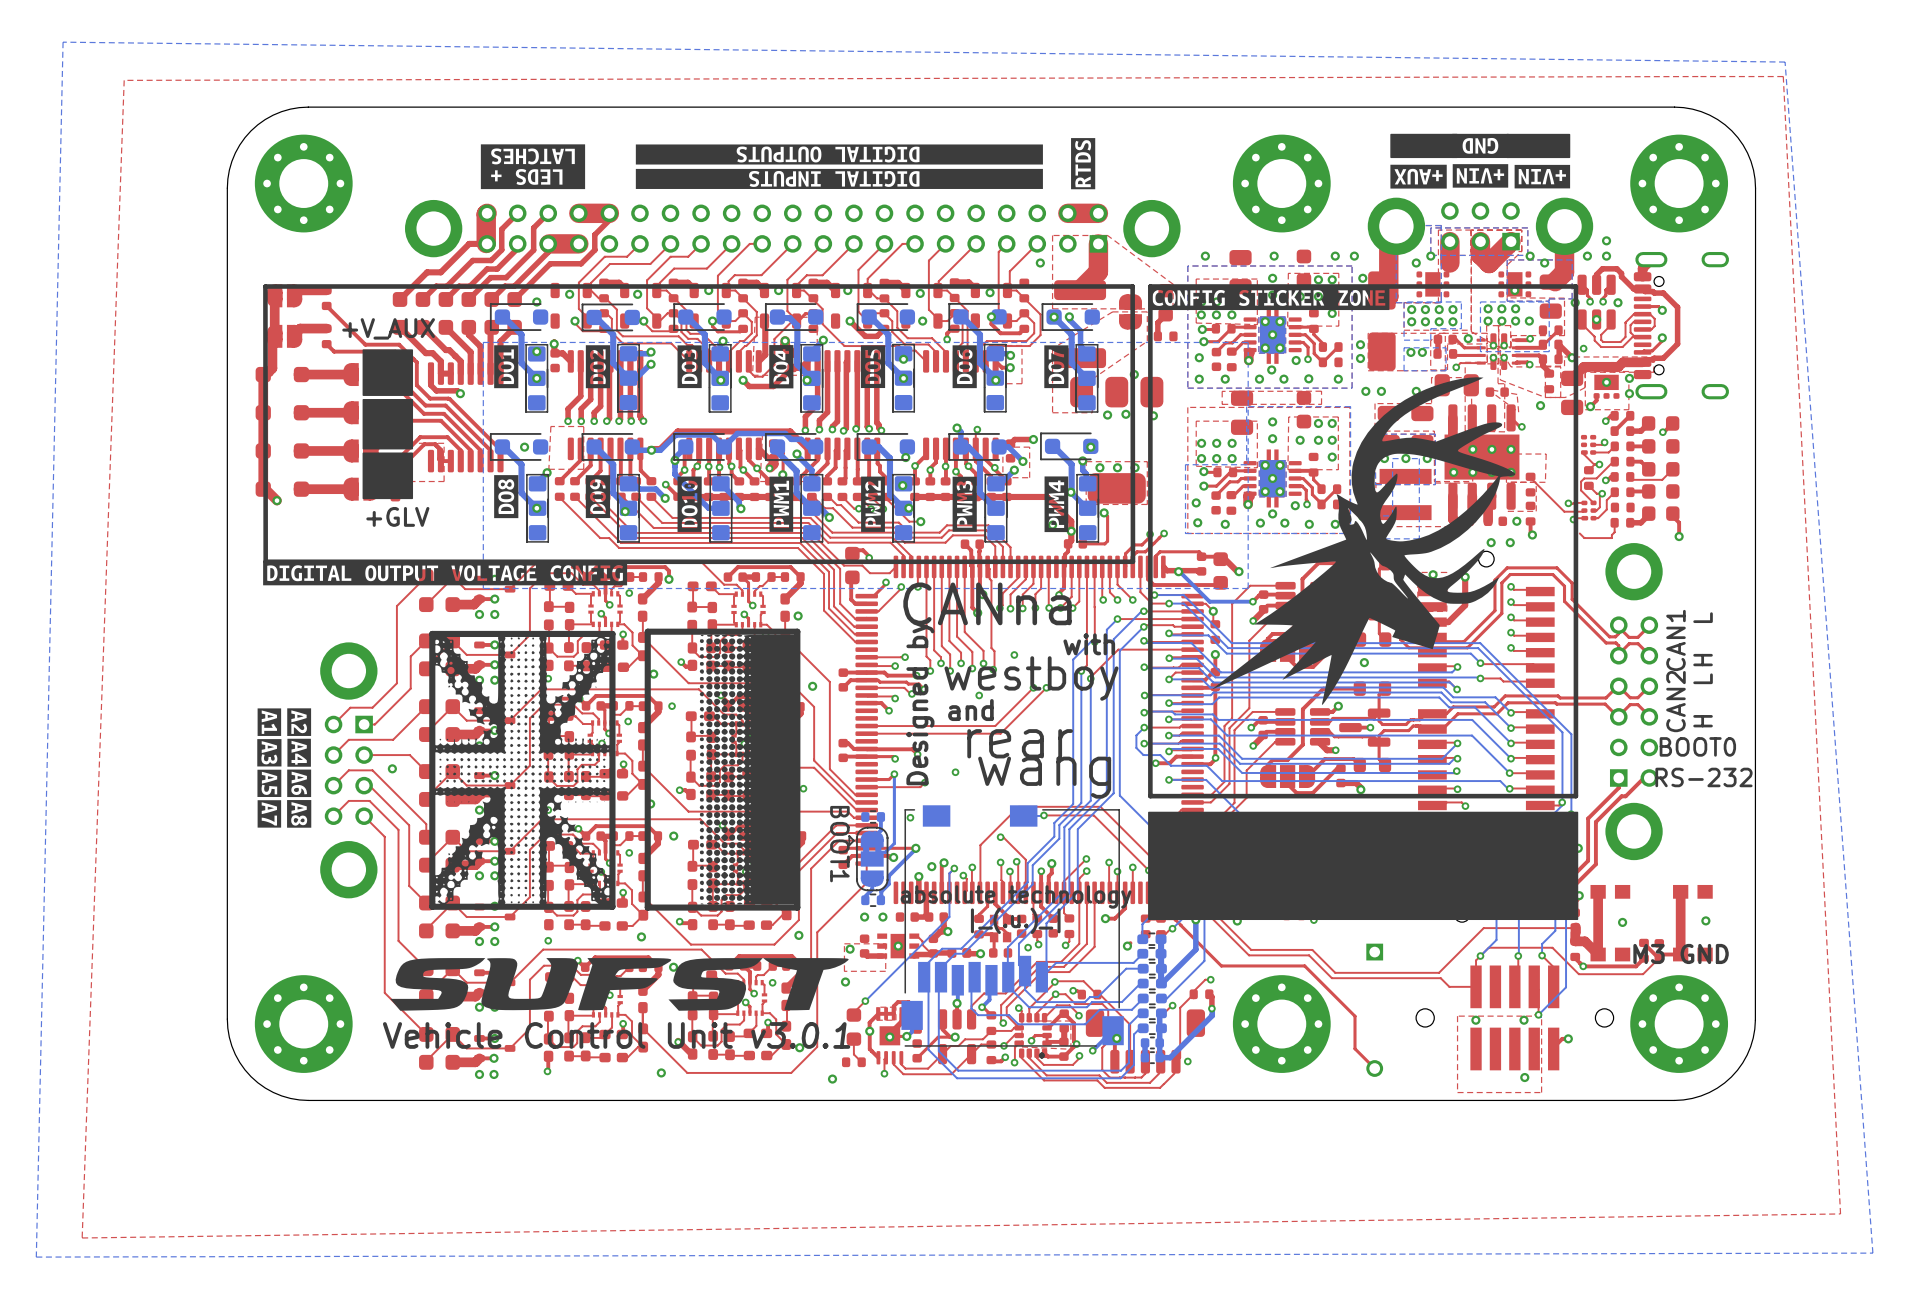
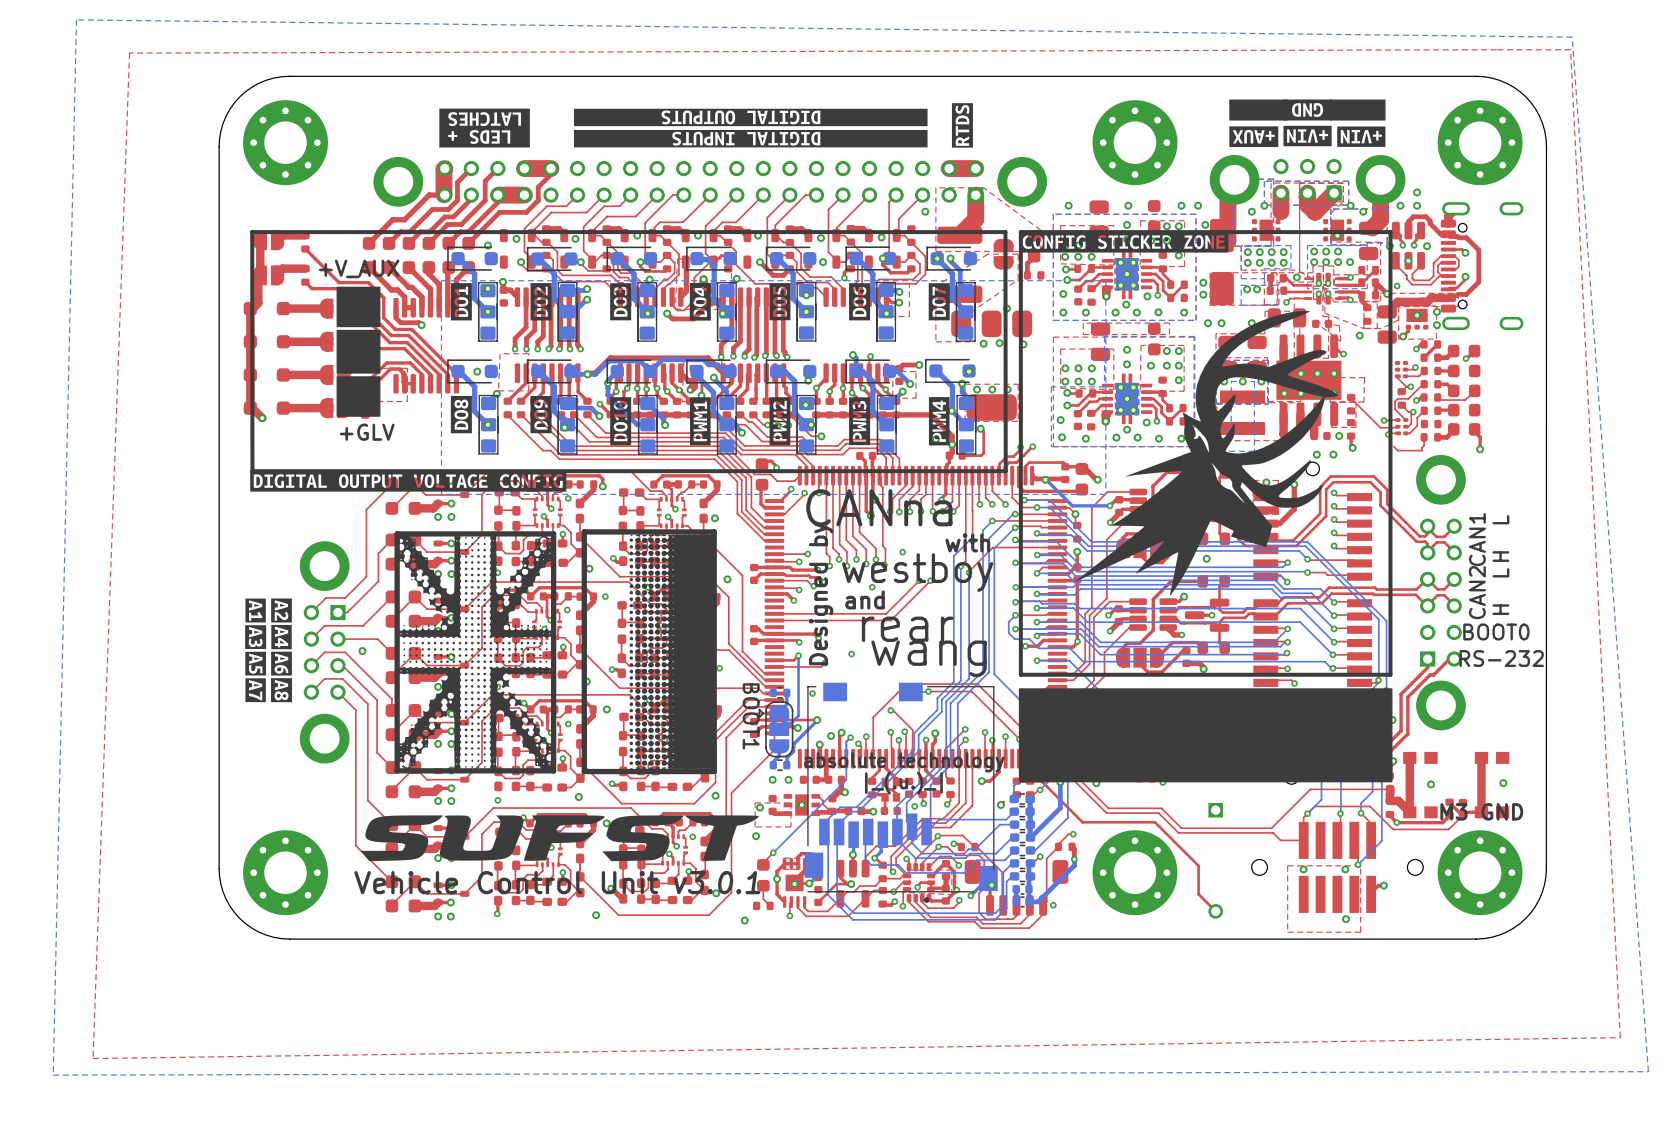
part footprint: [901, 805, 1124, 1059] -> [804, 682, 998, 903]

